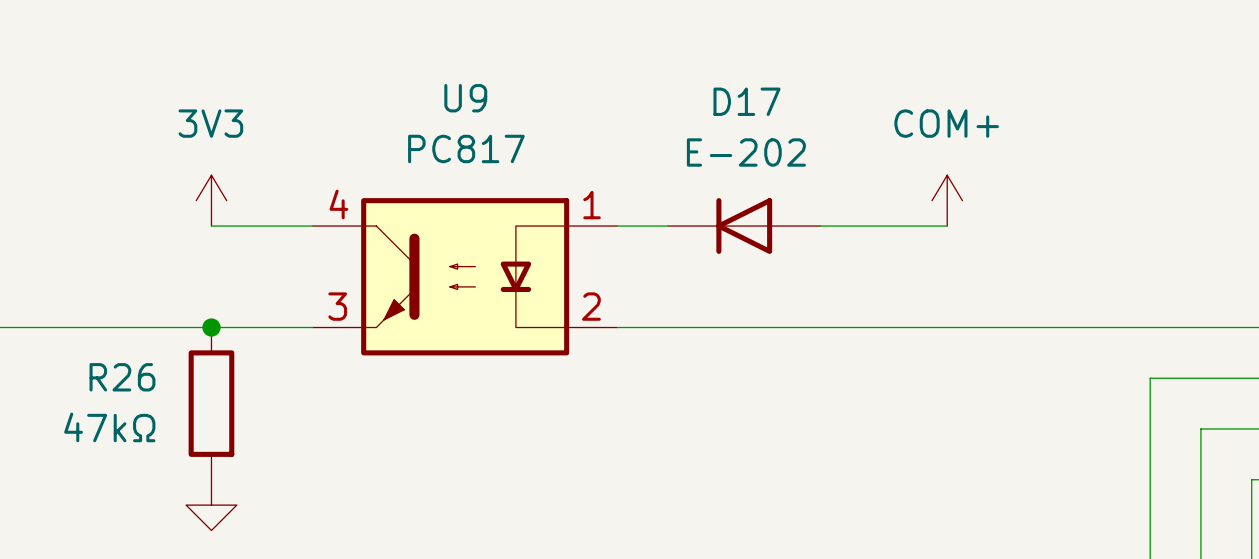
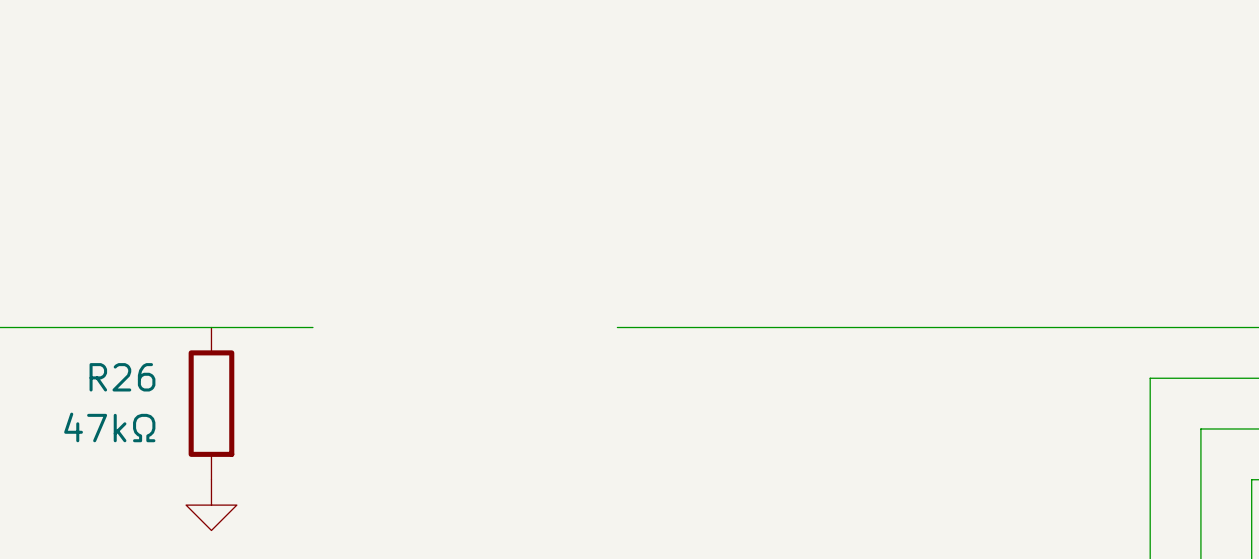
power symbol: 3V3 (211, 200) -> none
power symbol: COM+ (947, 200) -> none
wire: (211, 226) (312, 226) -> none
wire: (617, 226) (668, 226) -> none
D17: E-202 (744, 226) -> none
wire: (820, 226) (947, 226) -> none
U9: PC817 (465, 276) -> none
junction: (211, 327) -> none

